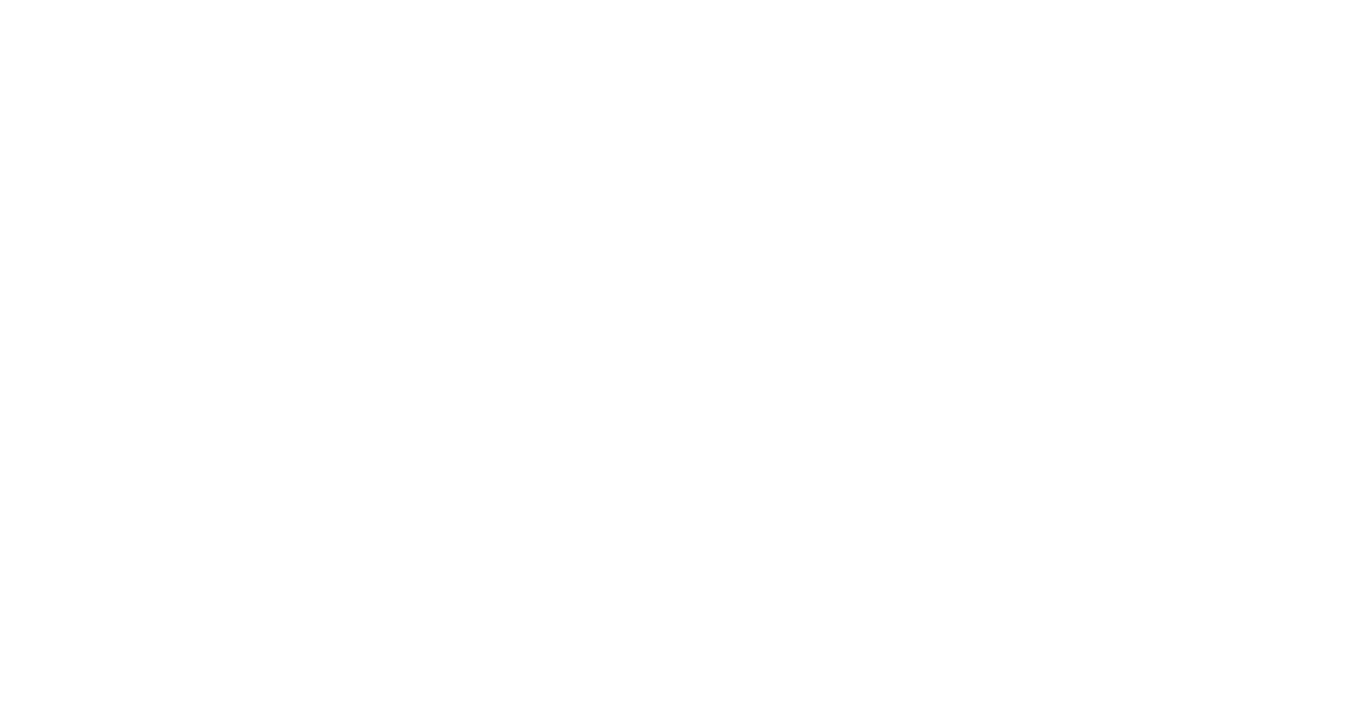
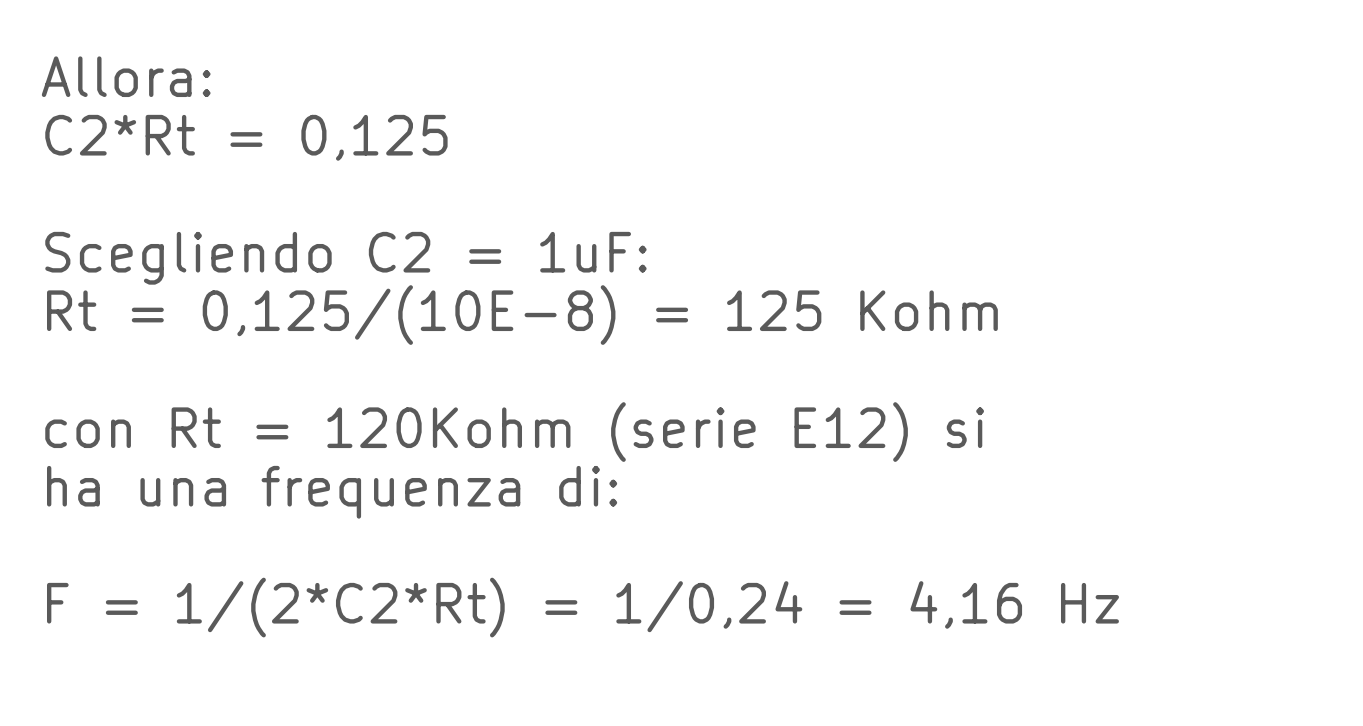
text: none -> Allora: (126, 76)
text: none -> C2*Rt = 0,125 (246, 137)
text: none -> Scegliendo C2 = 1uF: (345, 258)
text: none -> Rt = 0,125/(10E-8) = 125 Kohm (522, 315)
text: none -> con Rt = 120Kohm (serie E12) si (514, 432)
text: none -> ha una frequenza di: (332, 492)
text: none -> F = 1/(2*C2*Rt) = 1/0,24 = 4,16 Hz (582, 607)

